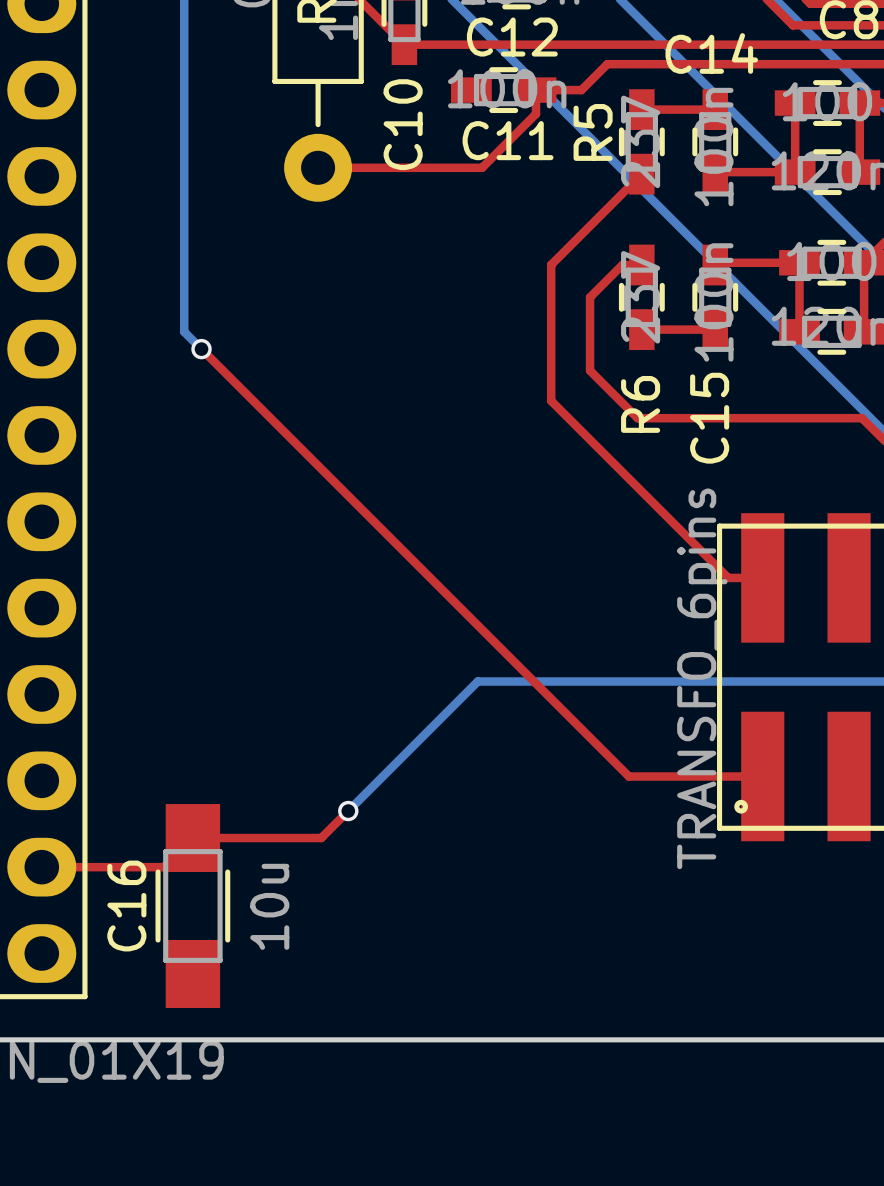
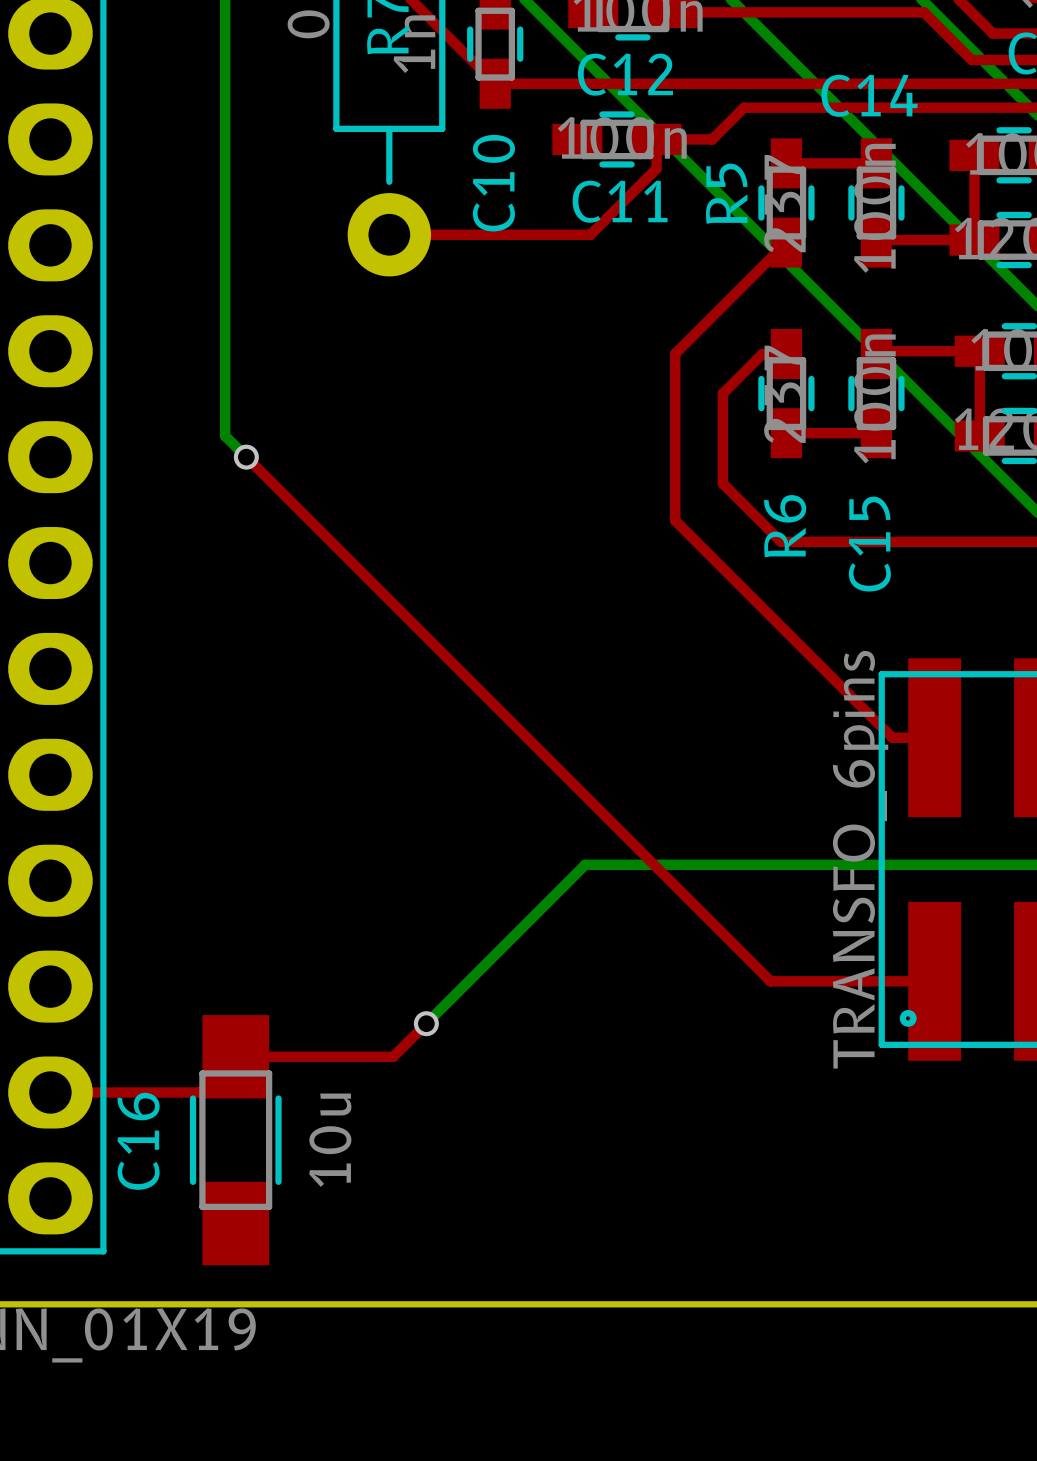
C16 name position: C16 (126, 906) -> C16 (138, 1141)

